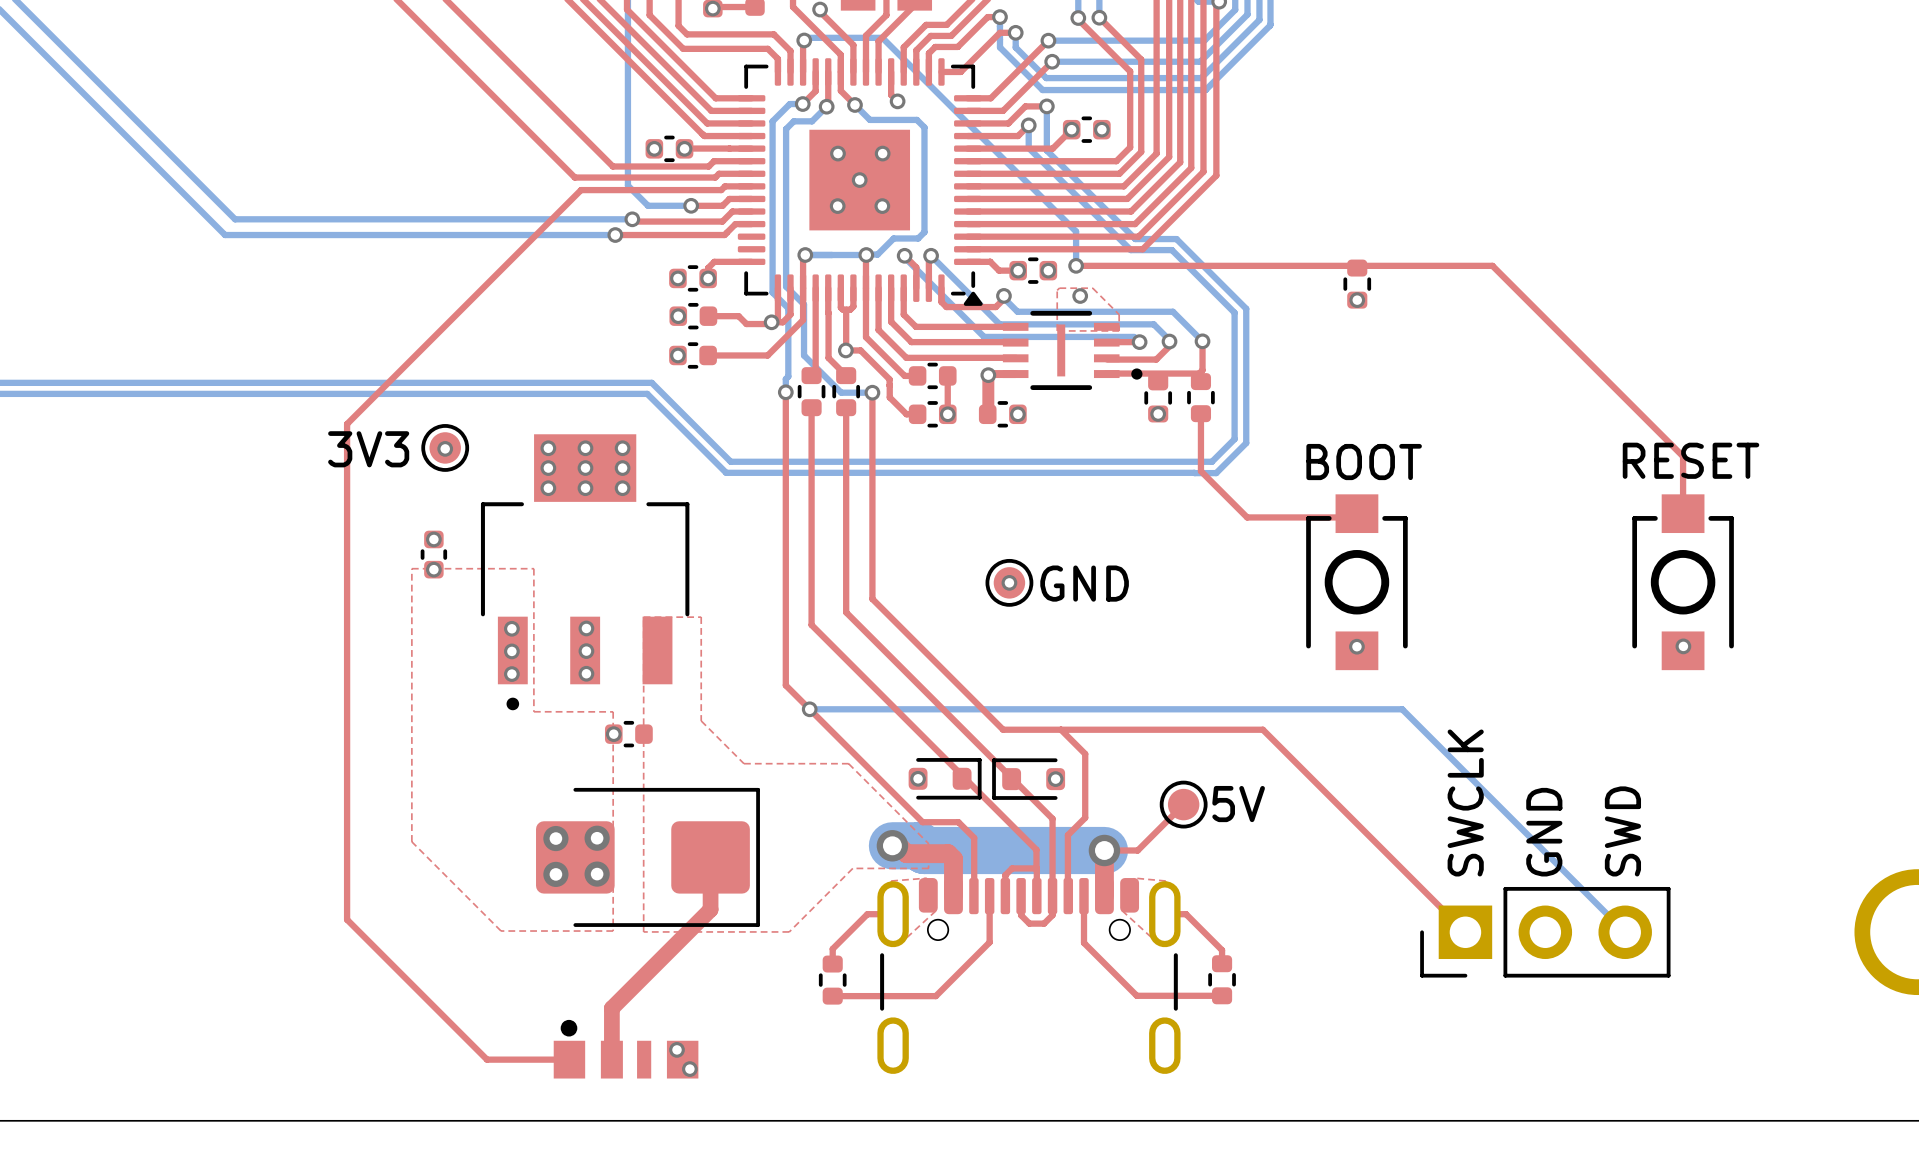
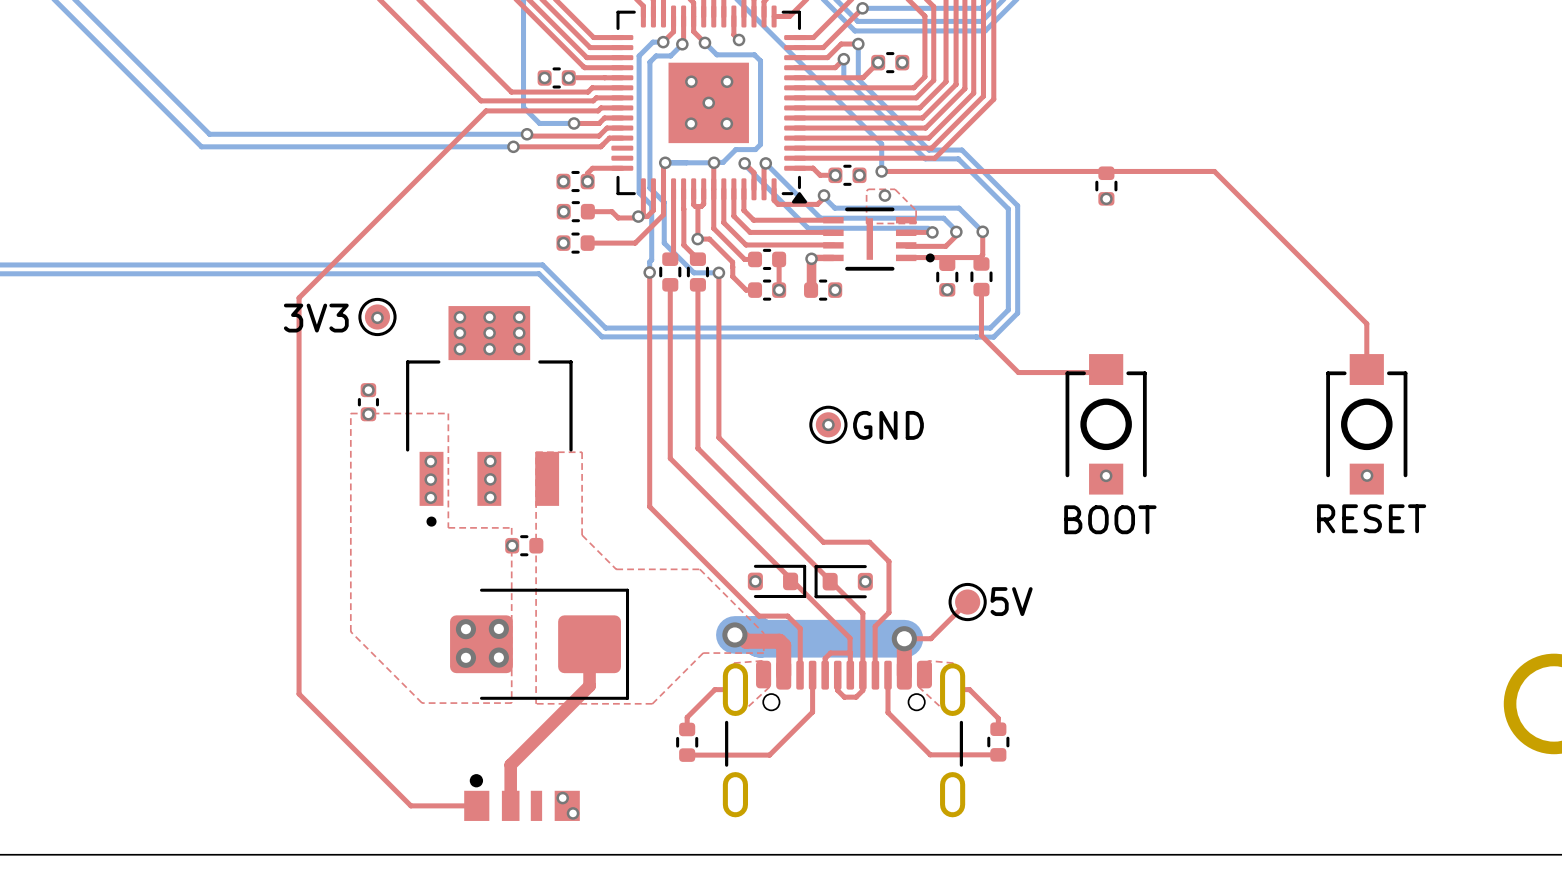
text position: RESET (1691, 460) -> RESET (1371, 518)
text position: BOOT (1364, 462) -> BOOT (1110, 519)
bottom track: (809, 709) (1402, 709) (1625, 932) -> none
via: (809, 709) -> none
top track: (1061, 729) (1262, 729) (1465, 932) -> none
text: SWCLK (1465, 802) -> none
text: SWD (1622, 831) -> none
text: GND (1544, 832) -> none
part: (1545, 932) -> none

